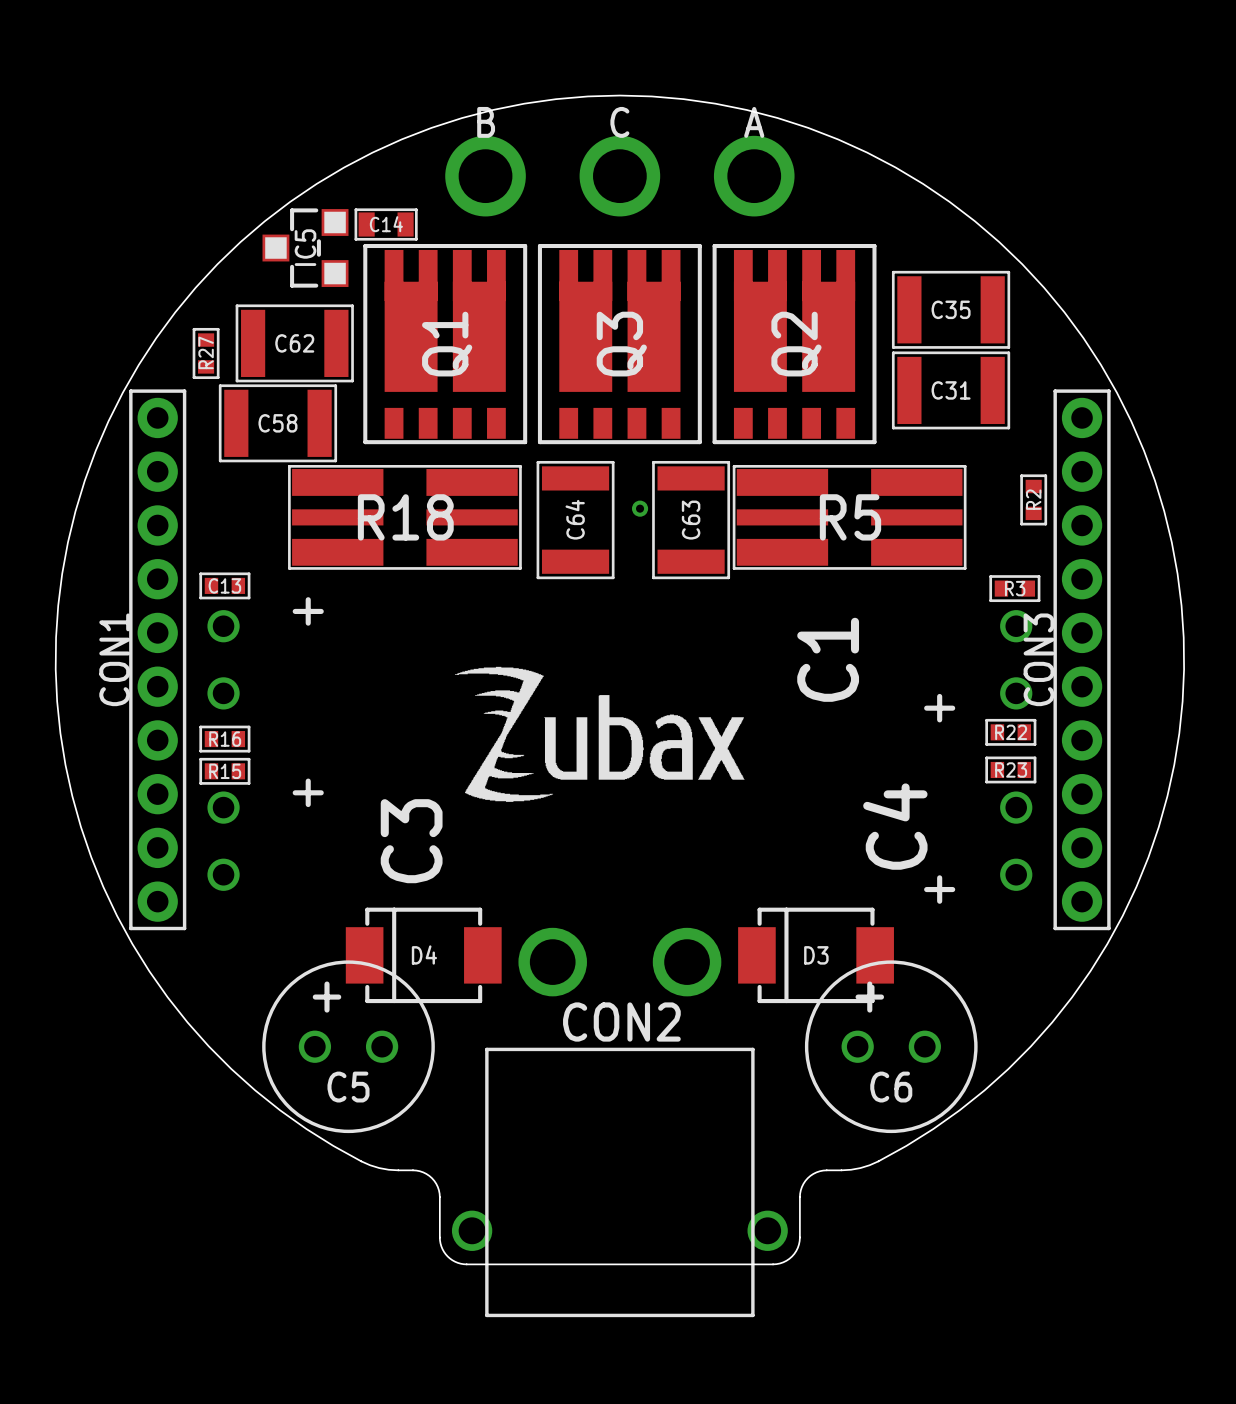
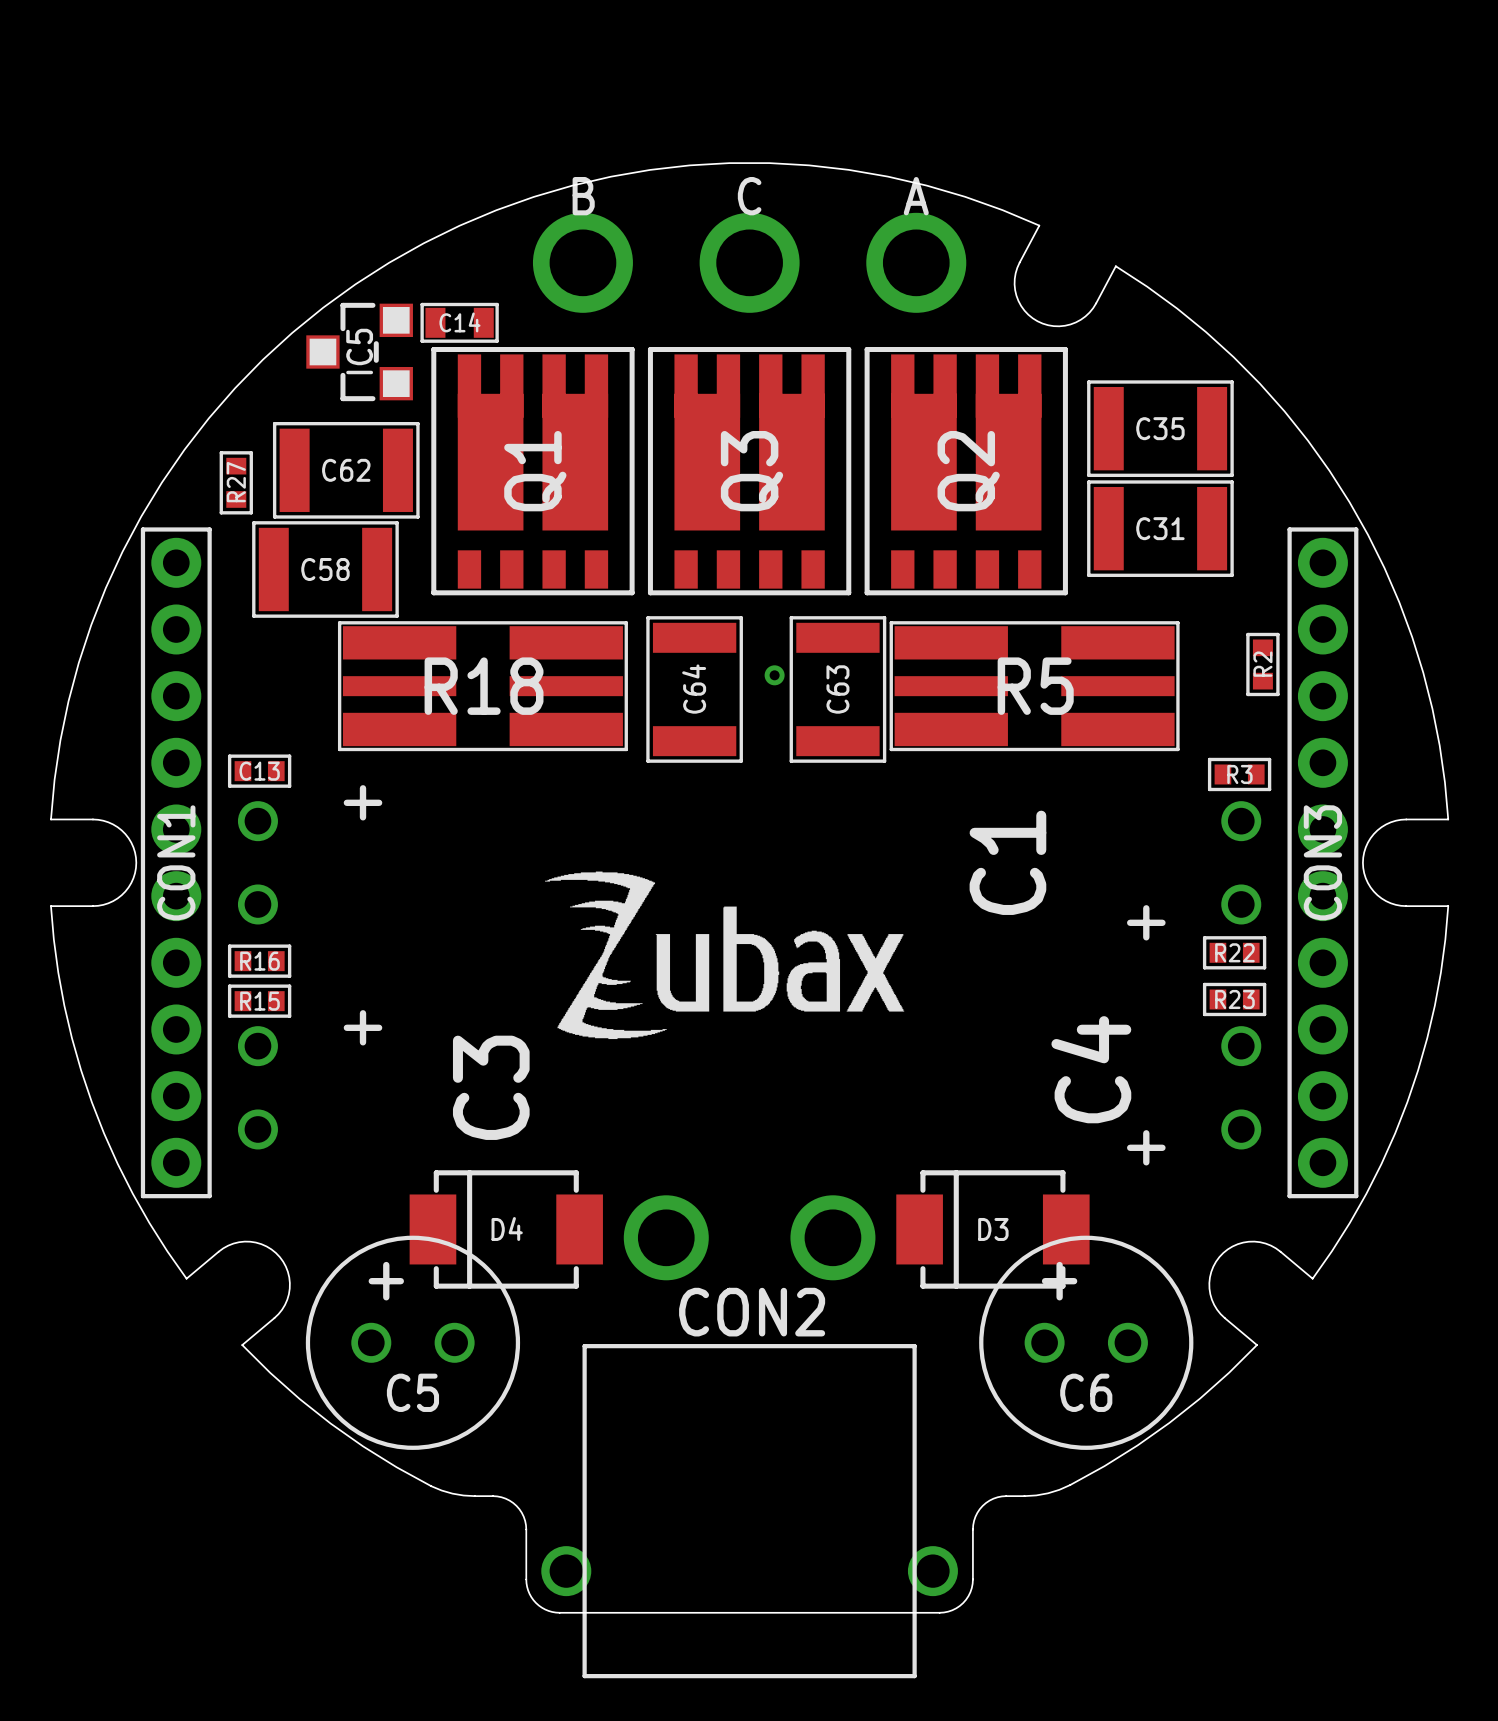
CON1 name position: CON1 (114, 659) -> CON1 (176, 862)
CON3 name position: CON3 (1039, 659) -> CON3 (1322, 862)
board edge: (878, 1161) (933, 1128) (959, 1110) (1008, 1069) (1030, 1046) (1052, 1022) (1090, 971) (1107, 943) (1136, 886) (1148, 857) (1167, 796) (1179, 733) (1182, 701) (1184, 669) (1181, 605) (1177, 573) (1164, 511) (1154, 480) (1131, 421) (1100, 364) (1083, 338) (1044, 287) (1022, 264) (974, 221) (949, 201) (895, 167) (867, 152) (808, 127) (777, 118) (715, 103) (683, 99) (619, 95) (556, 99) (524, 103) (462, 118) (431, 127) (372, 152) (344, 167) (290, 201) (264, 221) (217, 264) (195, 287) (156, 338) (138, 364) (108, 421) (95, 450) (84, 480) (67, 542) (58, 605) (56, 637) (57, 701) (60, 733) (72, 796) (80, 827) (91, 857) (117, 915) (149, 971) (167, 997) (187, 1022) (231, 1069) (280, 1110) (333, 1145) (370, 1165) (398, 1170) -> (1070, 1485) (1137, 1445) (1169, 1422) (1200, 1398) (1256, 1345) (1220, 1314) (1211, 1299) (1209, 1277) (1219, 1257) (1237, 1244) (1260, 1242) (1275, 1248) (1312, 1278) (1331, 1251) (1366, 1193) (1395, 1133) (1418, 1070) (1427, 1038) (1440, 972) (1448, 906) (1401, 905) (1386, 901) (1377, 895) (1367, 882) (1363, 868) (1363, 857) (1367, 842) (1373, 834) (1390, 822) (1406, 819) (1448, 819) (1439, 745) (1423, 672) (1412, 637) (1384, 568) (1367, 534) (1329, 470) (1307, 440) (1259, 383) (1206, 332) (1177, 308) (1115, 266) (1096, 303) (1085, 316) (1065, 325) (1042, 323) (1024, 310) (1016, 295) (1014, 284) (1017, 267) (1039, 225) (965, 196) (888, 176) (809, 165) (729, 163) (689, 165) (610, 176) (533, 196) (496, 210) (423, 243) (389, 262) (355, 284) (292, 332) (262, 359) (208, 418) (184, 449) (141, 516) (105, 587) (91, 625) (68, 701) (60, 740) (50, 819) (92, 819) (108, 822) (125, 834) (131, 842) (135, 857) (135, 868) (131, 882) (121, 895) (113, 901) (98, 905) (50, 906) (58, 972) (71, 1038) (81, 1070) (104, 1133) (132, 1193) (167, 1251) (186, 1278) (218, 1251) (233, 1243) (255, 1242) (275, 1252) (285, 1266) (289, 1277) (287, 1299) (278, 1314) (242, 1345) (299, 1399) (363, 1446) (431, 1486) (452, 1493) (474, 1496)

